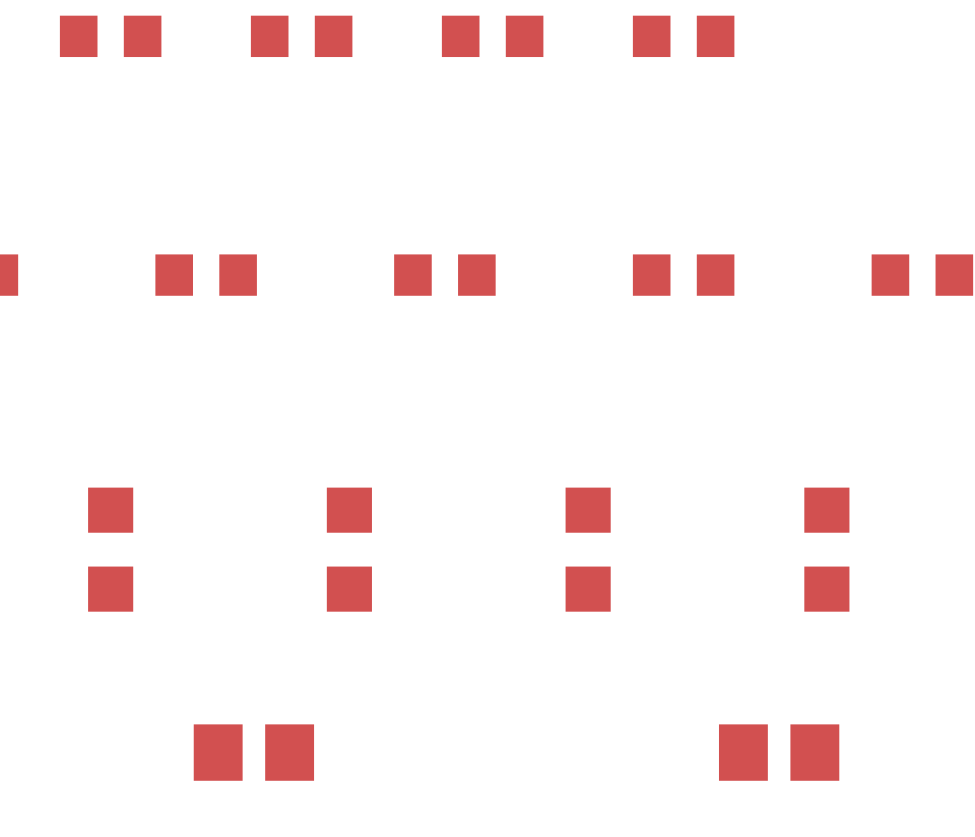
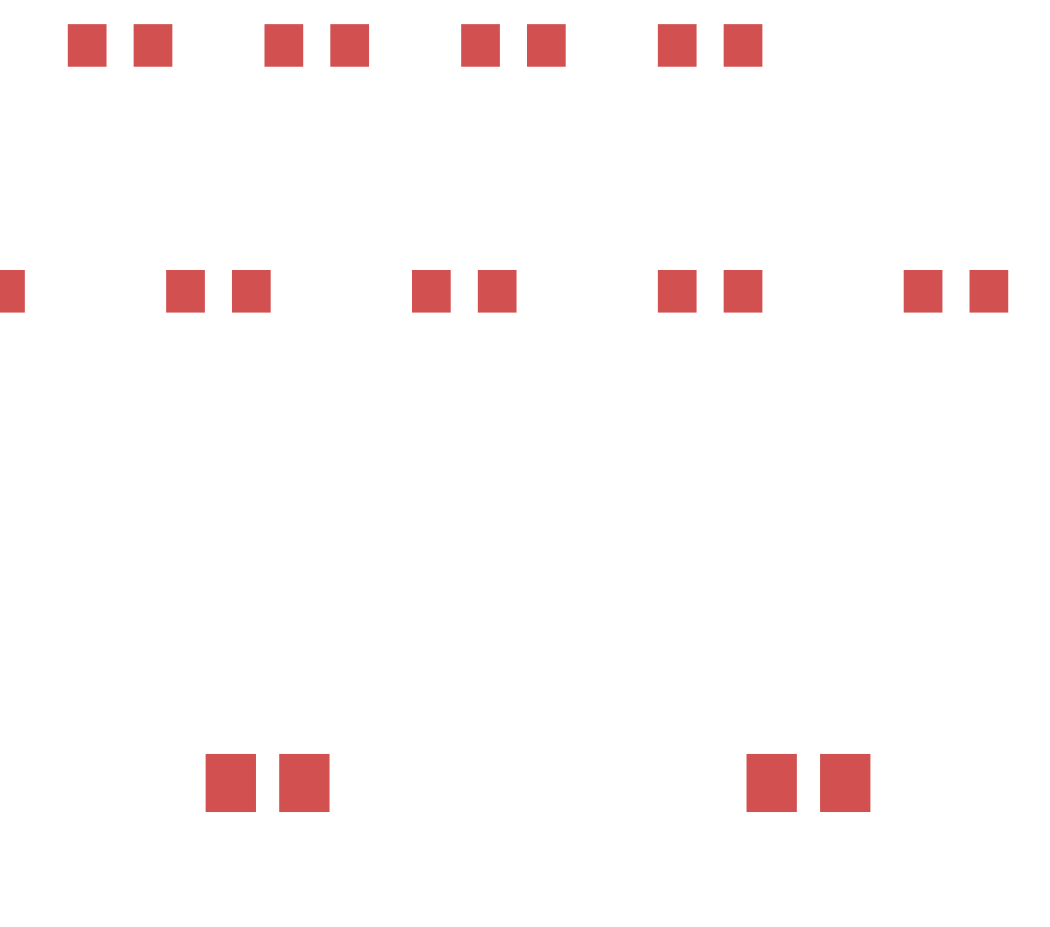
part: (110, 549) -> none
part: (349, 549) -> none
part: (588, 549) -> none
part: (826, 549) -> none

